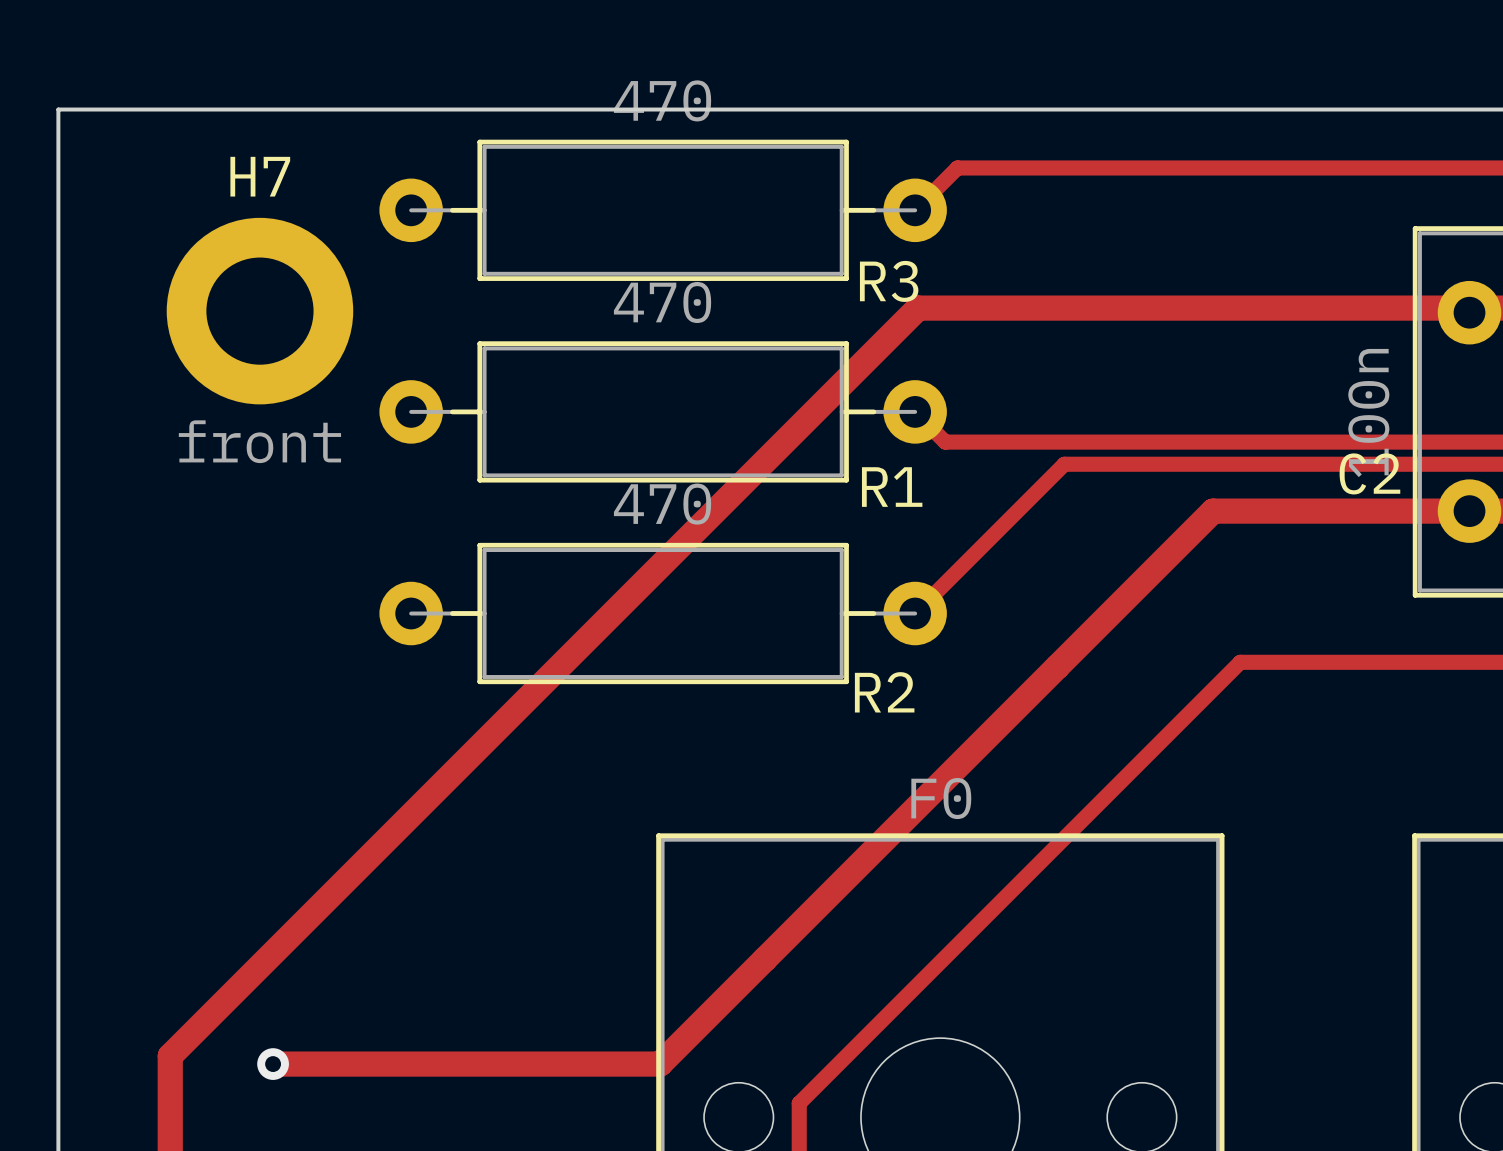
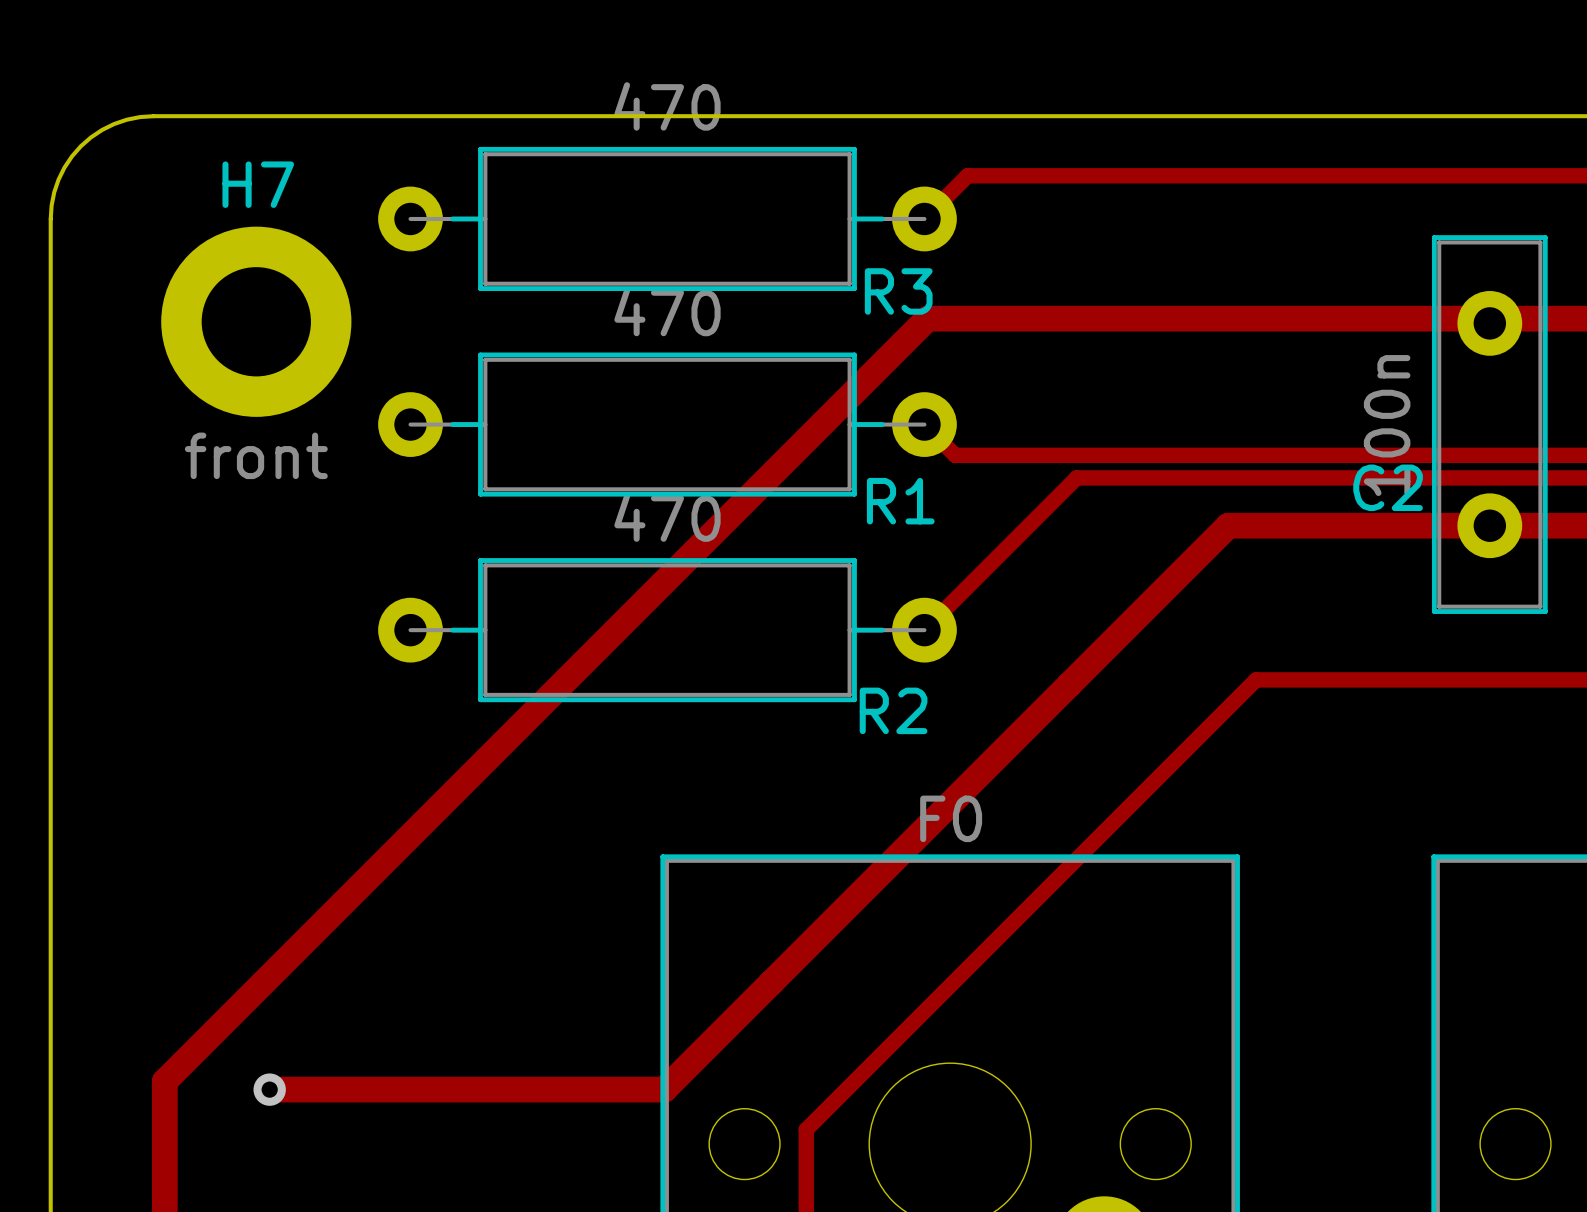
board edge: (159, 109) (58, 109) (58, 210) -> (153, 116) (140, 117) (114, 124) (102, 129) (80, 146) (71, 156) (58, 179) (54, 192) (50, 218)

